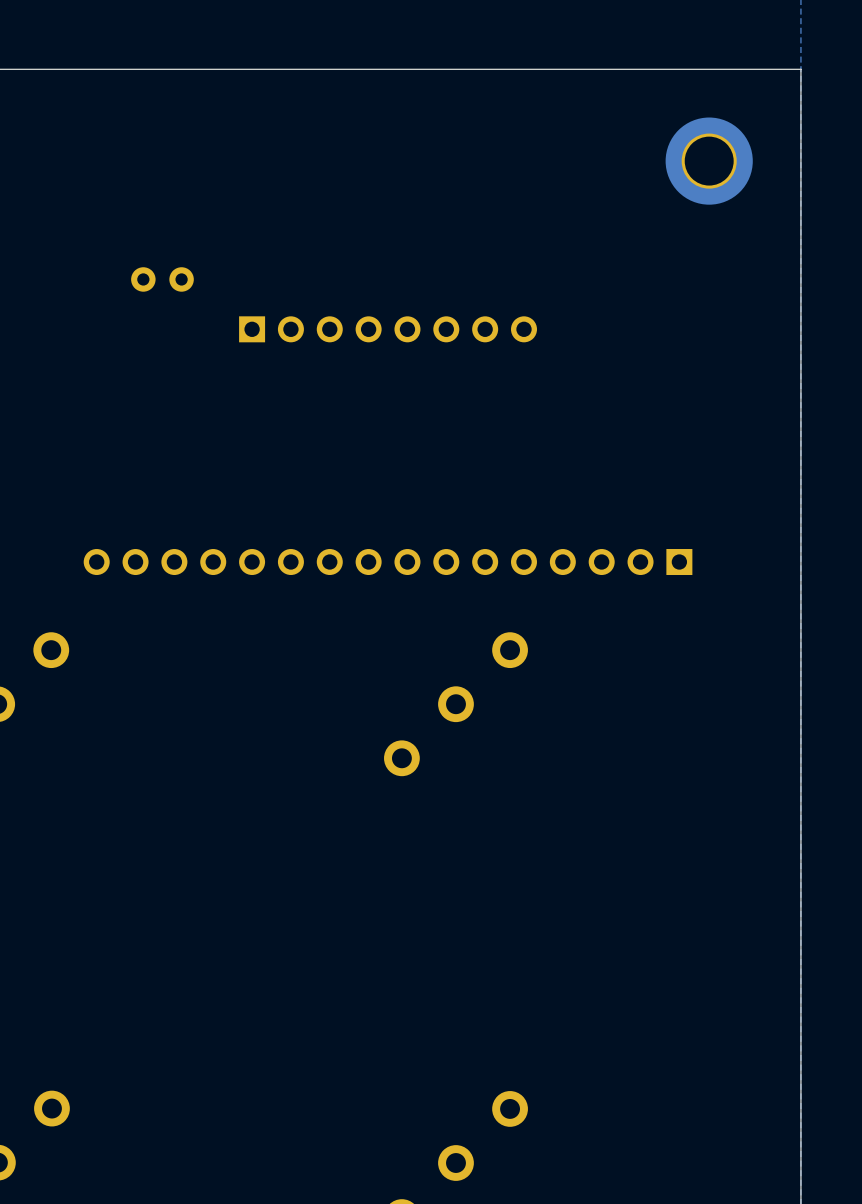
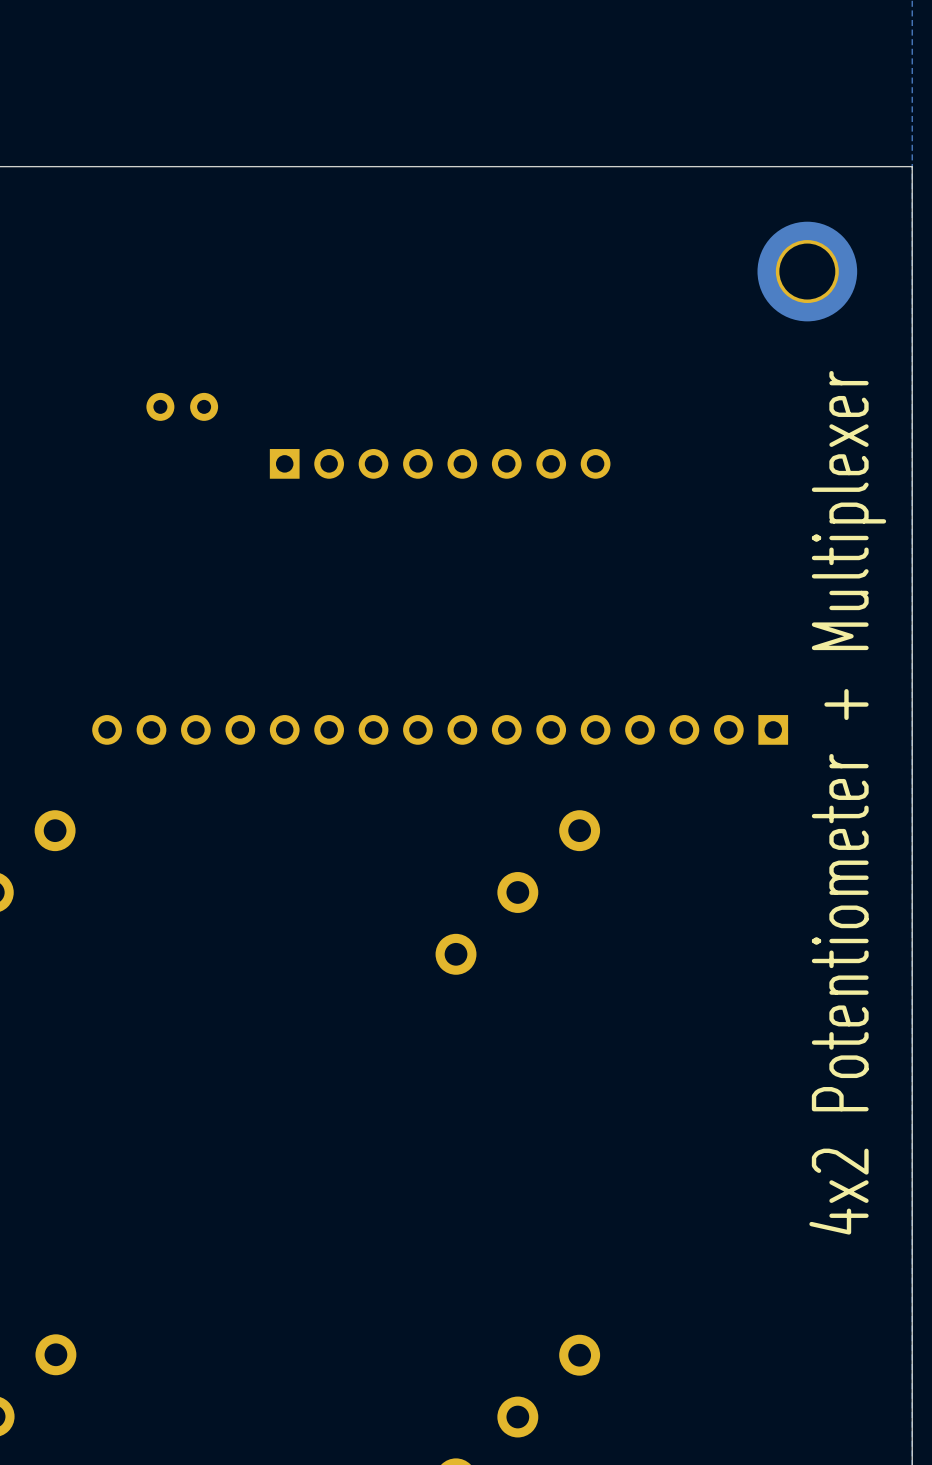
text: none -> 4x2 Potentiometer + Multiplexer (847, 802)

